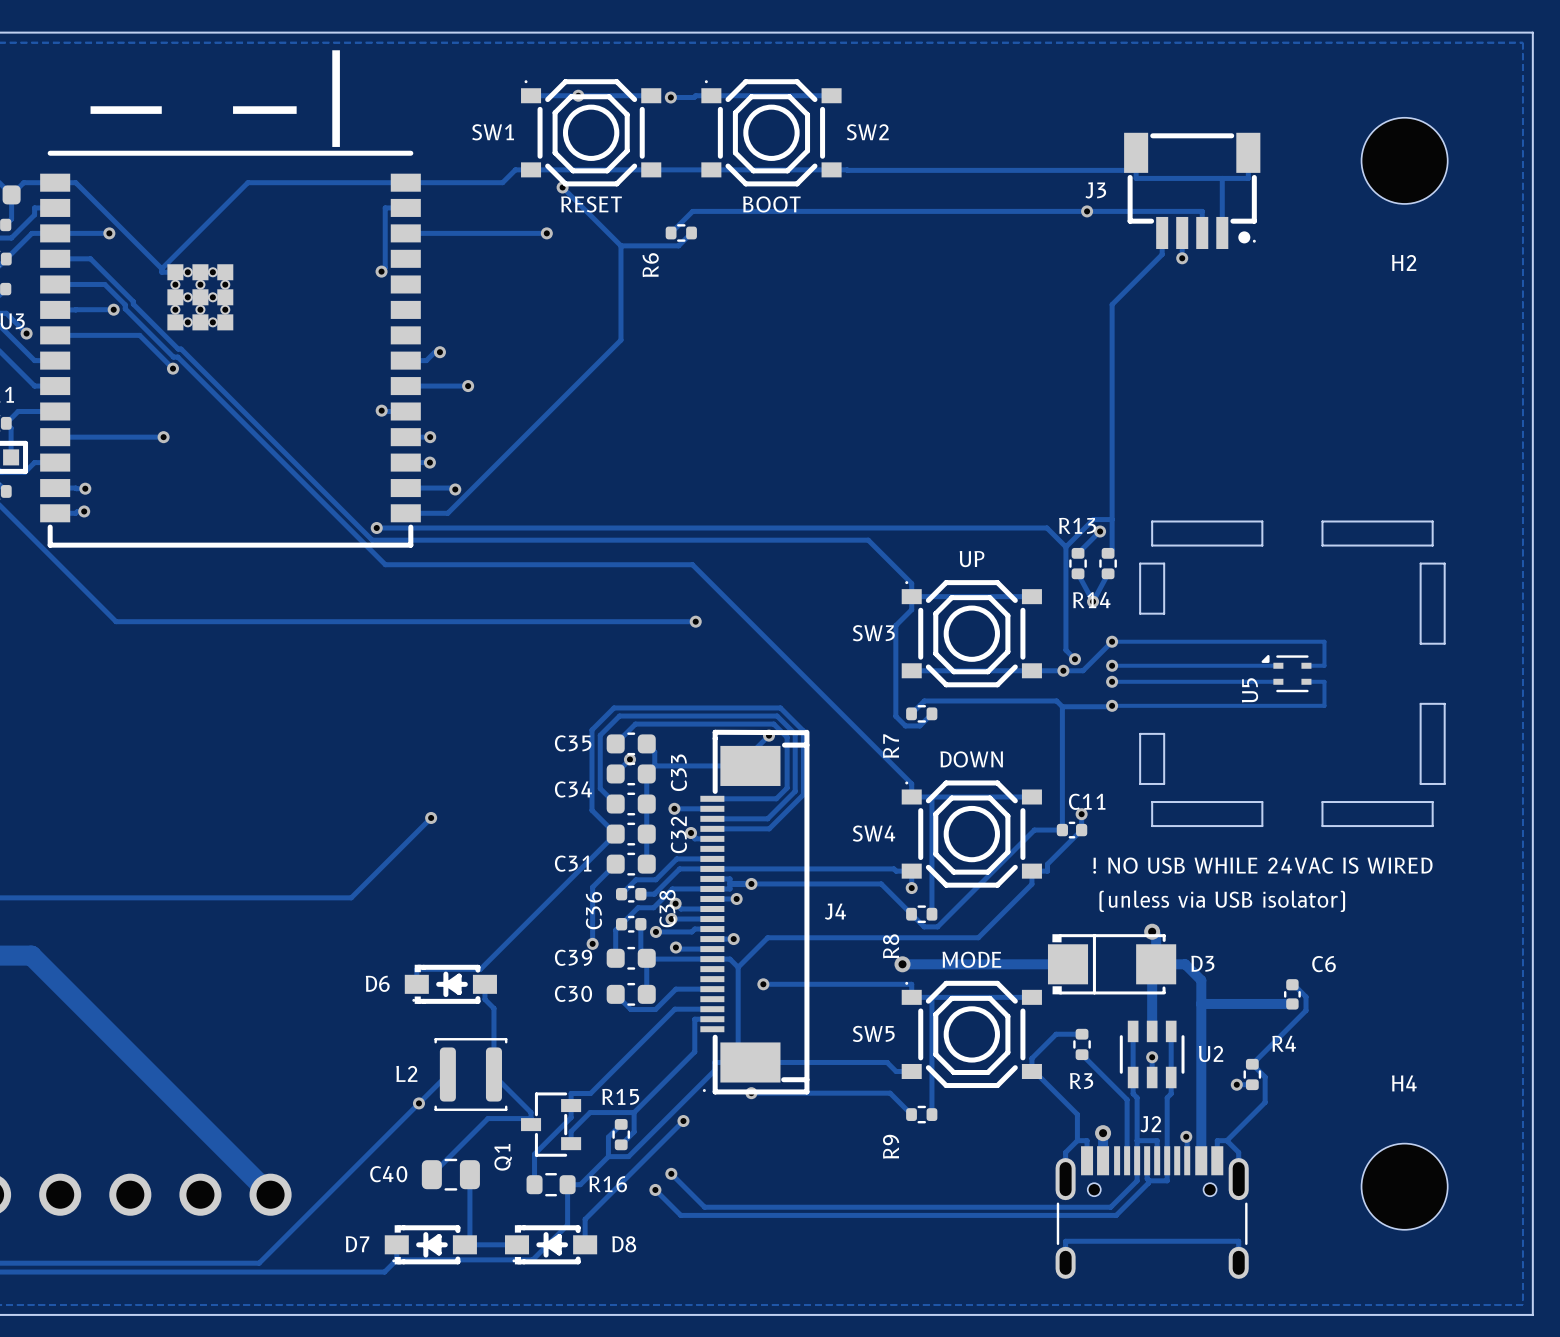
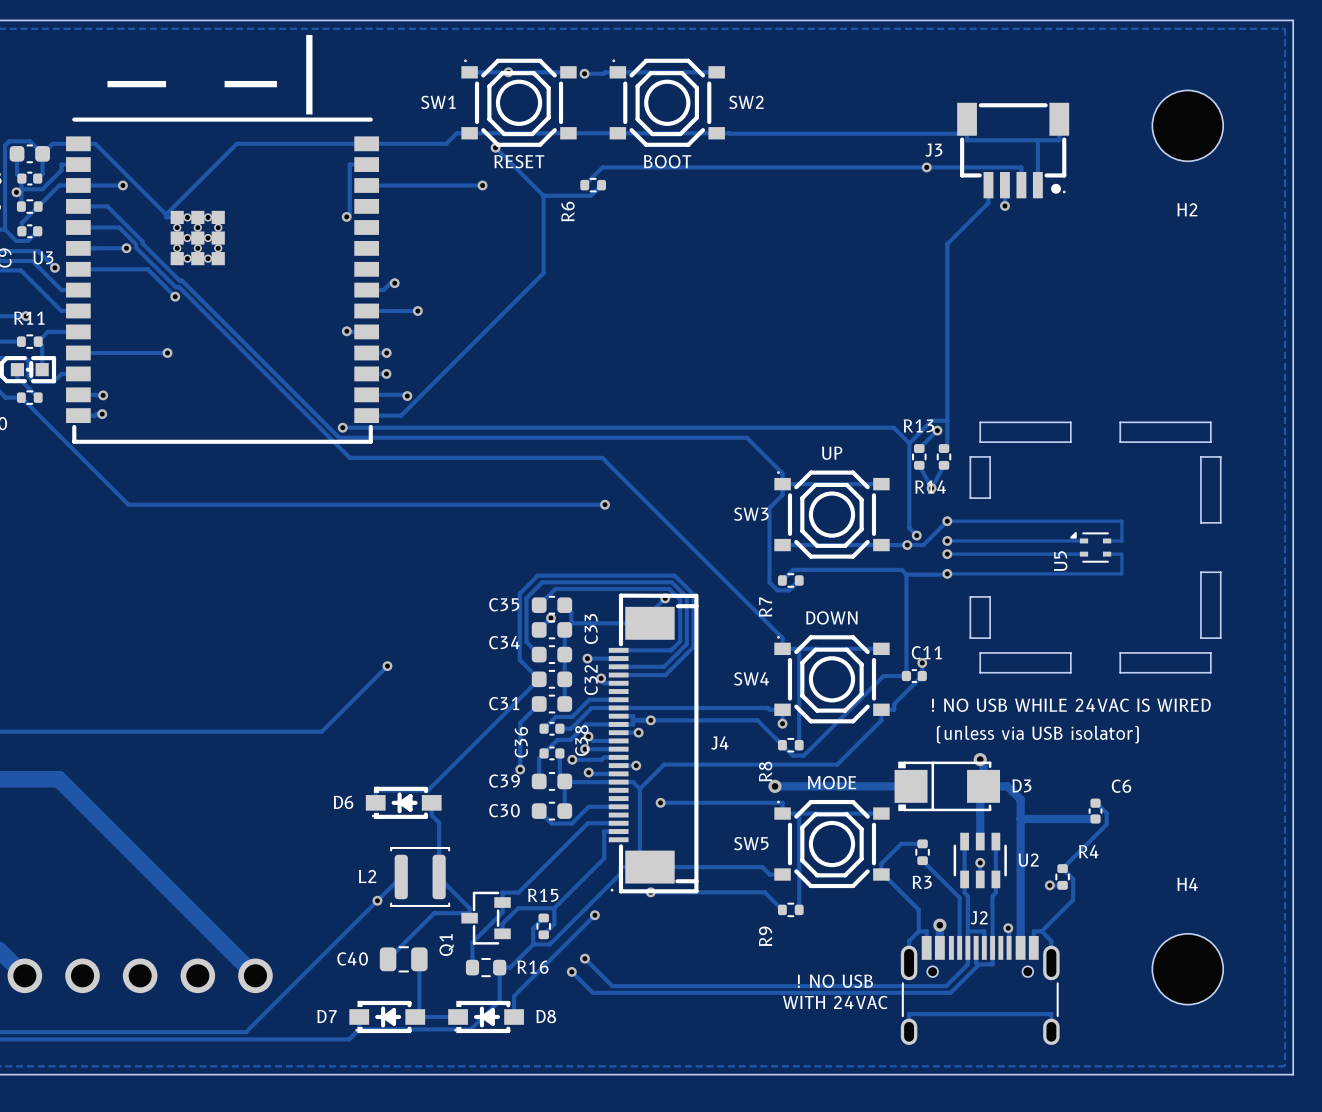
text: none -> ! NO USB (835, 981)
text: none -> WITH 24VAC (835, 1002)

